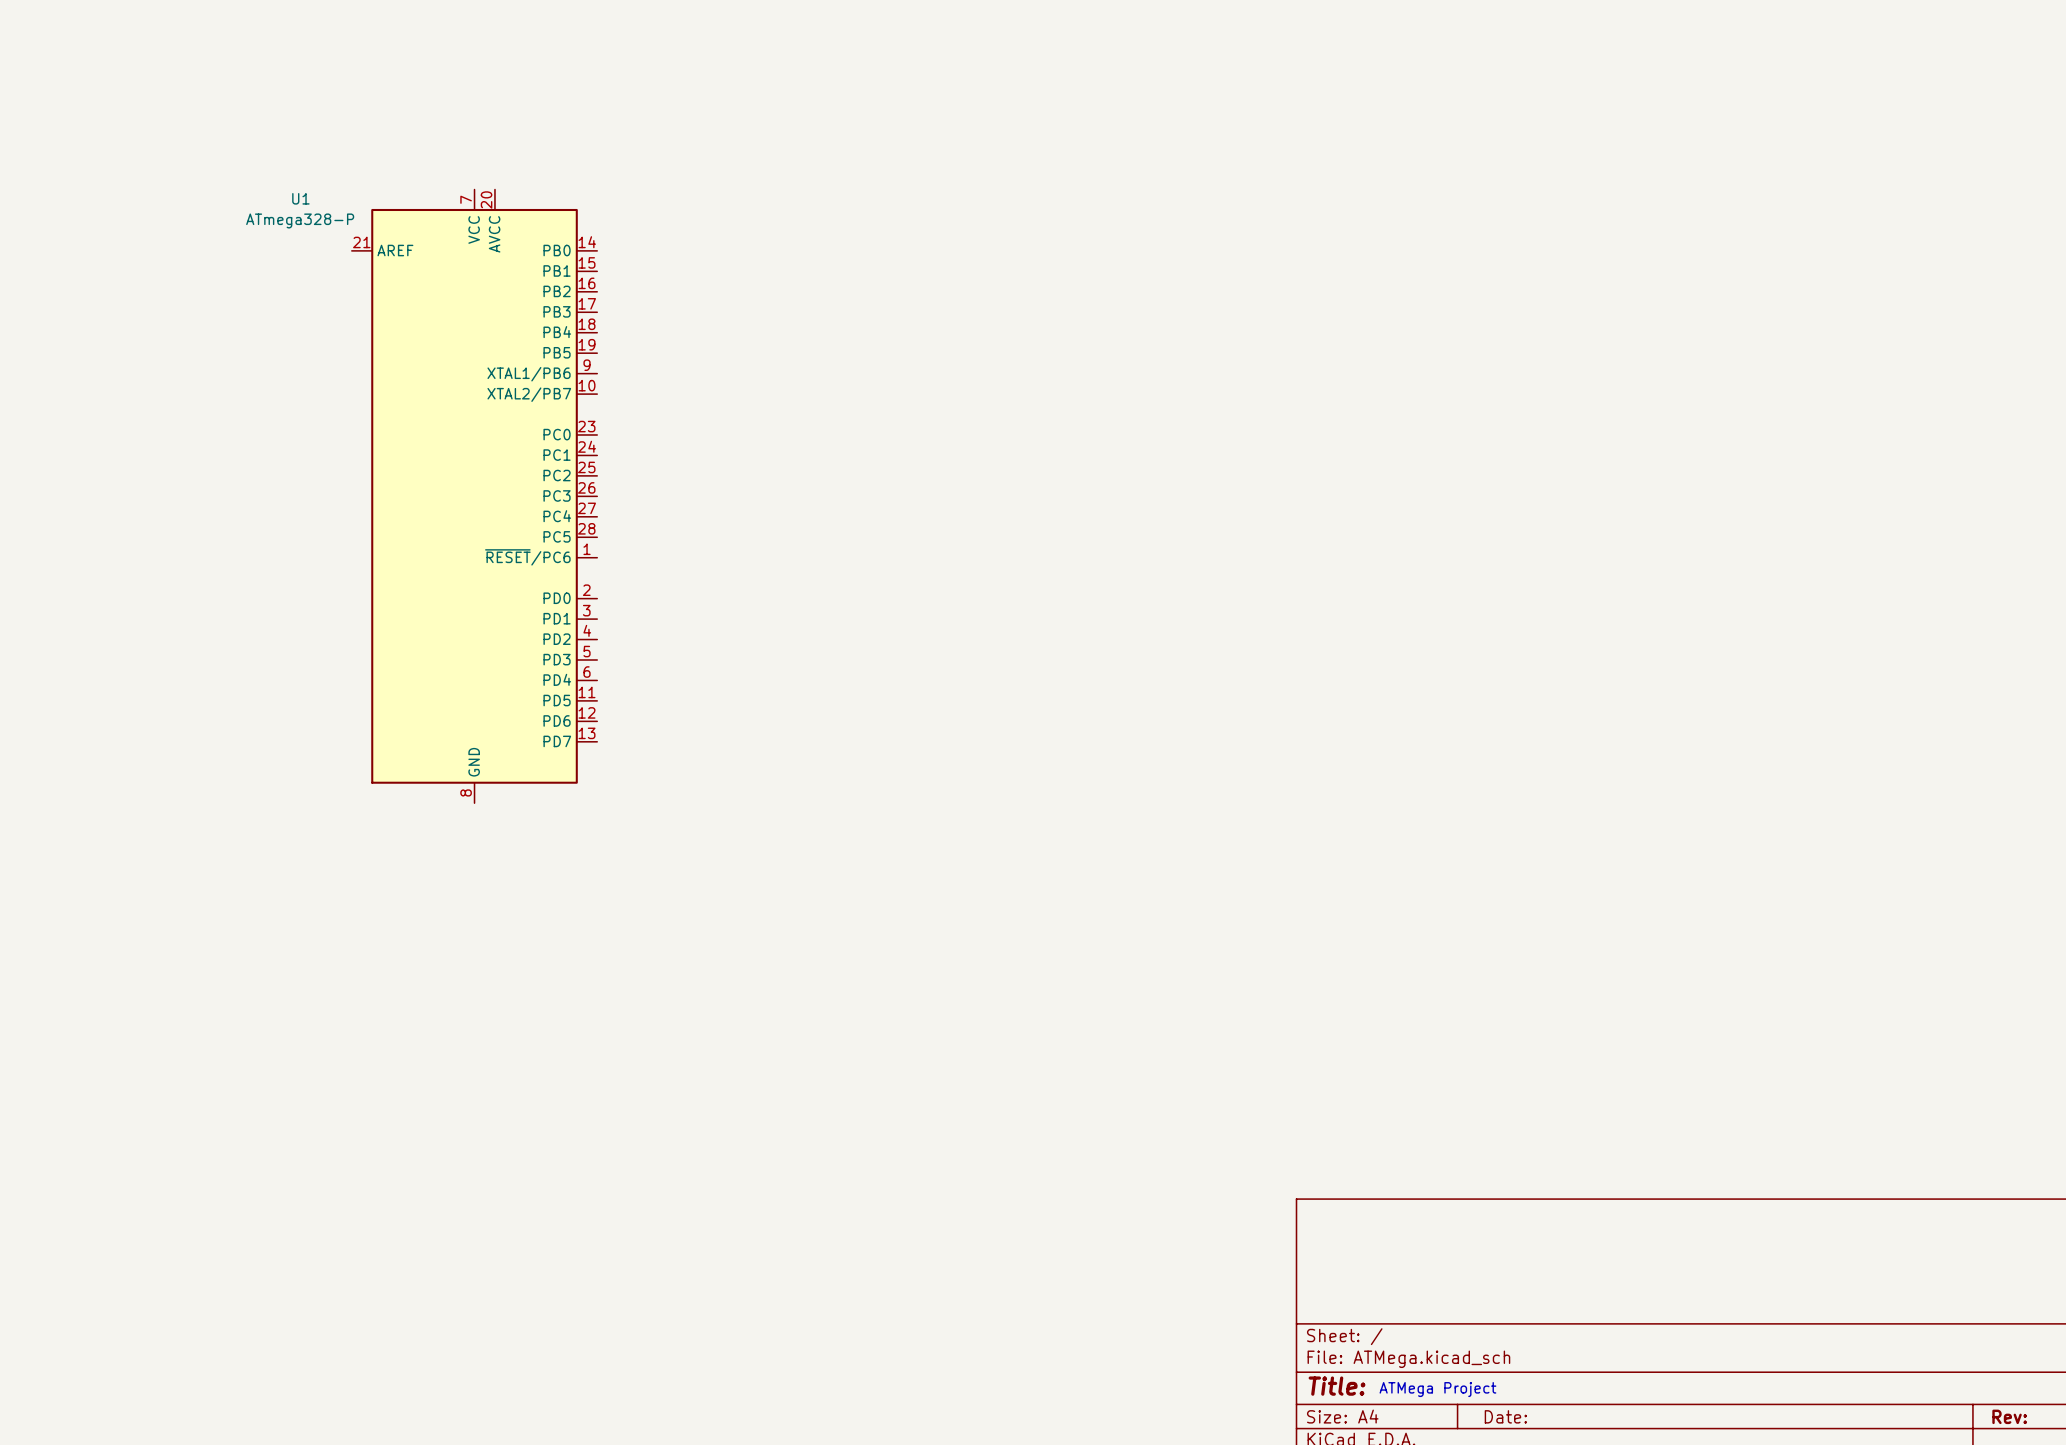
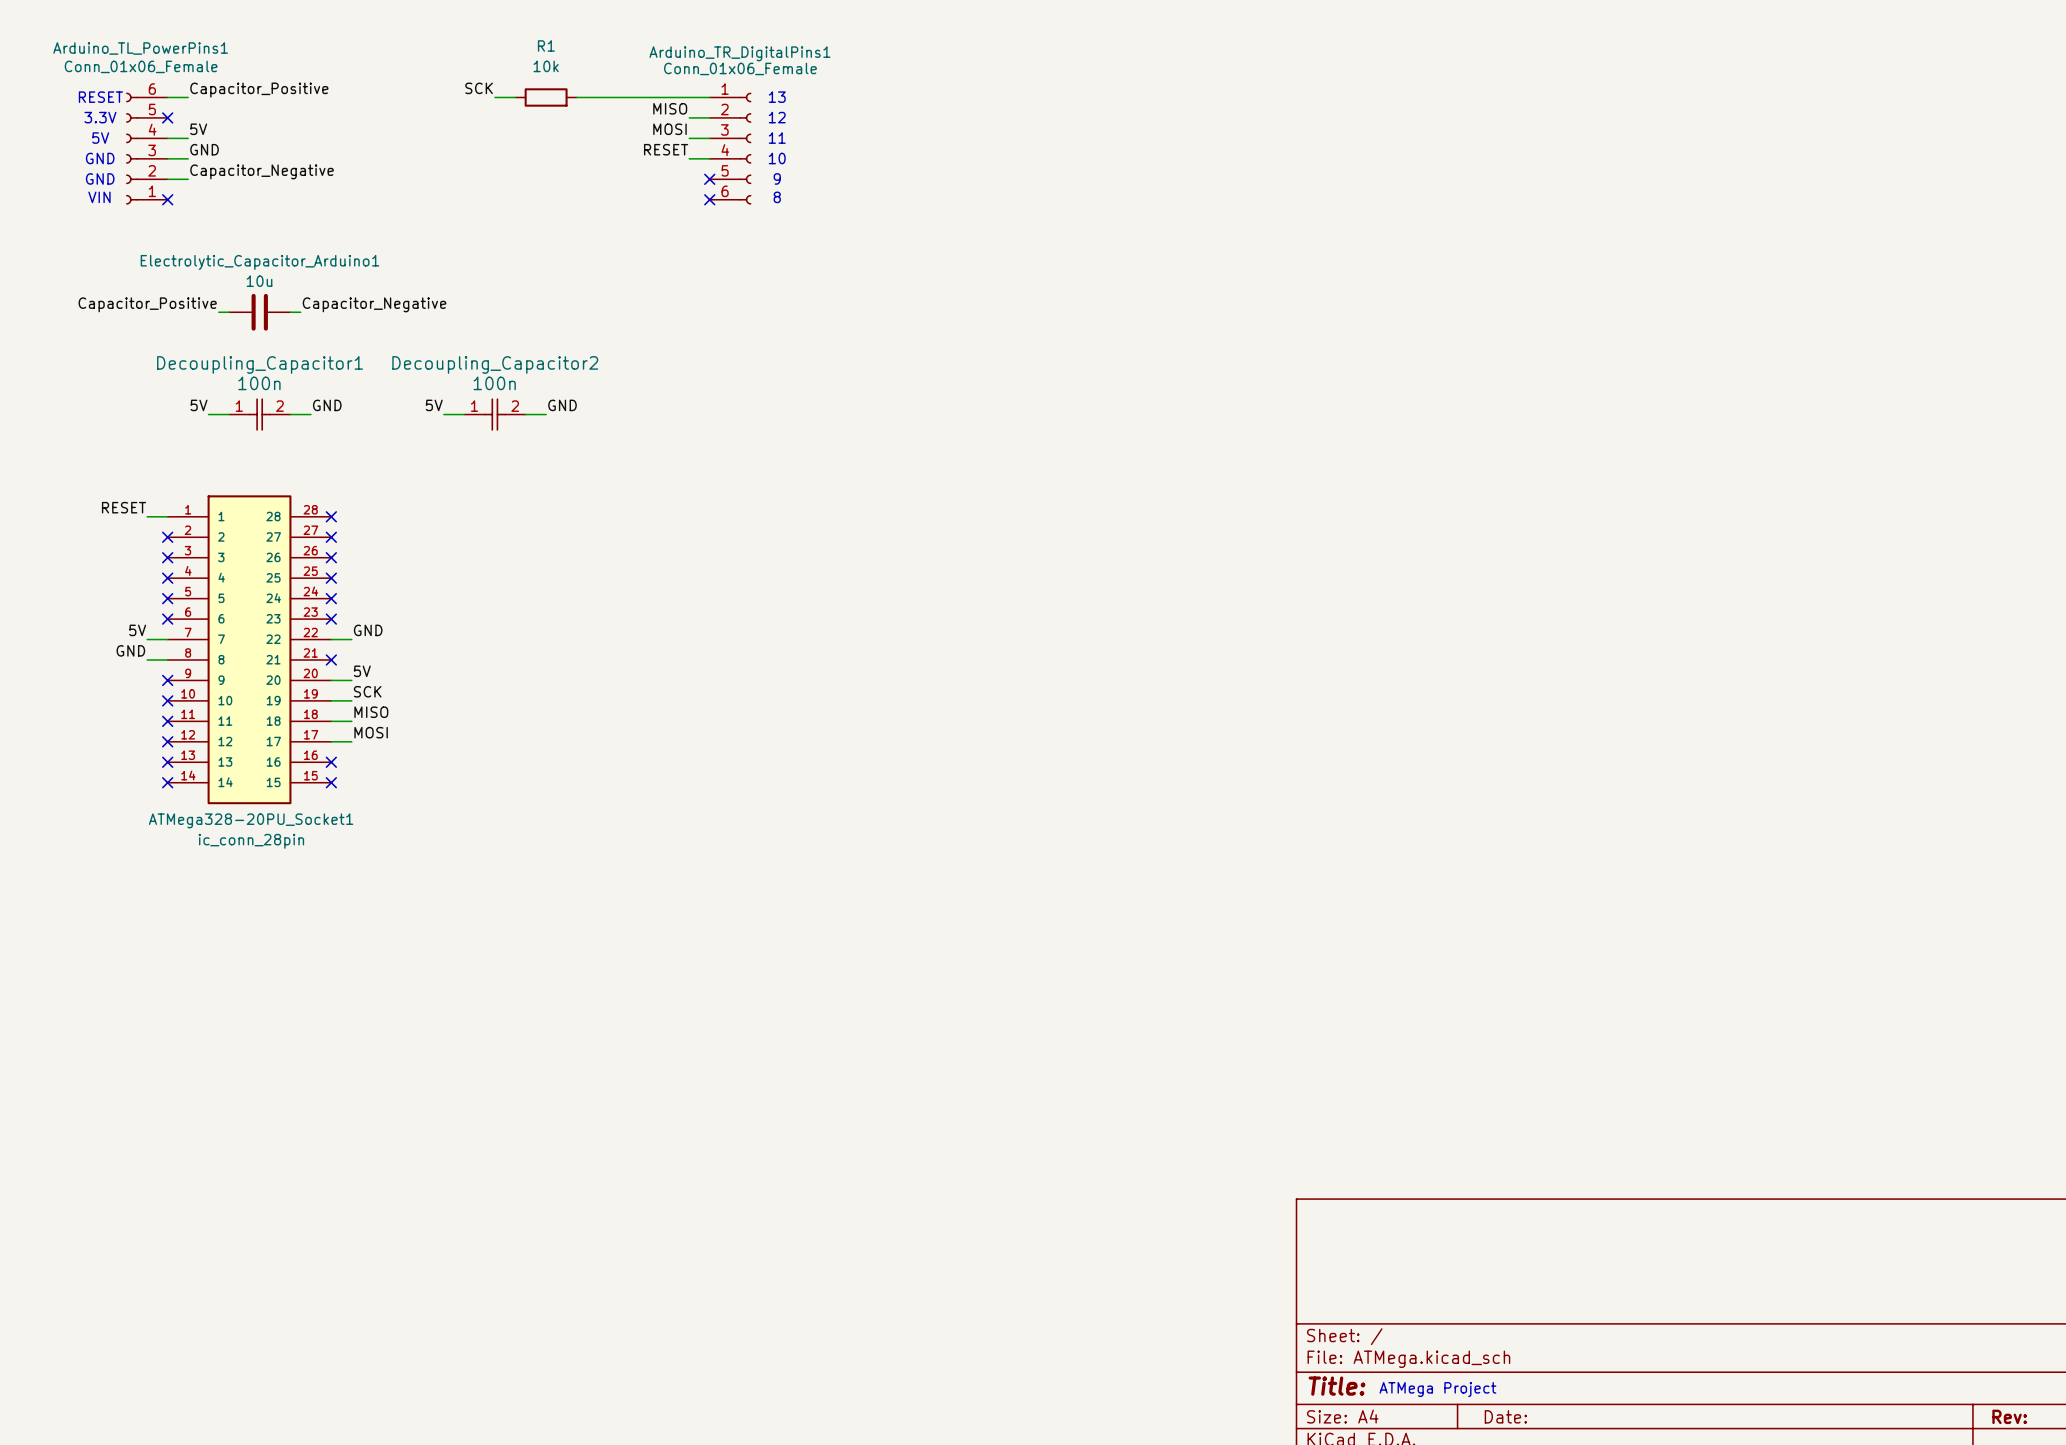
label: none -> SCK (479, 88)
label: none -> Capacitor_Positive (259, 90)
text: none -> RESET (100, 97)
wire: none -> (167, 97) (188, 97)
wire: none -> (494, 97) (515, 97)
R1: none -> 10k (546, 97)
wire: none -> (576, 97) (709, 97)
text: none -> 13 (777, 97)
label: none -> MISO (670, 108)
text: none -> 3.3V (100, 117)
no-connect mark: none -> (167, 117)
wire: none -> (689, 117) (709, 117)
text: none -> 12 (777, 117)
label: none -> 5V (198, 129)
label: none -> MOSI (669, 129)
text: none -> 5V (100, 138)
wire: none -> (167, 138) (188, 138)
wire: none -> (689, 138) (709, 138)
text: none -> 11 (777, 138)
Arduino_TL_PowerPins1: none -> Conn_01x06_Female (146, 148)
Arduino_TR_DigitalPins1: none -> Conn_01x06_Female (730, 148)
label: none -> GND (204, 149)
label: none -> RESET (666, 149)
text: none -> GND (100, 158)
wire: none -> (167, 158) (188, 158)
wire: none -> (689, 158) (709, 158)
text: none -> 10 (777, 158)
label: none -> Capacitor_Negative (262, 171)
text: none -> GND (100, 178)
text: none -> 9 (777, 178)
wire: none -> (167, 179) (188, 179)
no-connect mark: none -> (709, 179)
text: none -> VIN (99, 197)
text: none -> 8 (777, 197)
no-connect mark: none -> (167, 199)
no-connect mark: none -> (709, 199)
label: none -> Capacitor_Positive (147, 304)
label: none -> Capacitor_Negative (374, 304)
wire: none -> (218, 312) (229, 312)
Electrolytic_Capacitor_Arduino1: none -> 10u (259, 312)
wire: none -> (290, 312) (300, 312)
label: none -> 5V (199, 405)
label: none -> GND (327, 405)
label: none -> 5V (434, 405)
label: none -> GND (562, 405)
wire: none -> (208, 414) (229, 414)
Decoupling_Capacitor1: none -> 100n (259, 414)
wire: none -> (290, 414) (310, 414)
Decoupling_Capacitor2: none -> 100n (494, 414)
U1: ATmega328-P (474, 496) -> none
label: none -> RESET (124, 507)
wire: none -> (147, 516) (167, 516)
no-connect mark: none -> (331, 516)
no-connect mark: none -> (167, 537)
no-connect mark: none -> (331, 537)
no-connect mark: none -> (167, 557)
no-connect mark: none -> (331, 557)
no-connect mark: none -> (167, 578)
no-connect mark: none -> (331, 578)
no-connect mark: none -> (167, 598)
no-connect mark: none -> (331, 598)
no-connect mark: none -> (167, 619)
no-connect mark: none -> (331, 619)
label: none -> 5V (137, 630)
label: none -> GND (368, 630)
wire: none -> (147, 639) (167, 639)
wire: none -> (331, 639) (351, 639)
ATMega328-20PU_Socket1: none -> ic_conn_28pin (249, 649)
label: none -> GND (130, 650)
wire: none -> (147, 659) (167, 659)
no-connect mark: none -> (331, 659)
label: none -> 5V (362, 671)
no-connect mark: none -> (167, 680)
wire: none -> (331, 680) (351, 680)
label: none -> SCK (367, 691)
no-connect mark: none -> (167, 700)
wire: none -> (331, 700) (351, 700)
label: none -> MISO (371, 712)
no-connect mark: none -> (167, 721)
wire: none -> (331, 721) (351, 721)
label: none -> MOSI (371, 732)
no-connect mark: none -> (167, 741)
wire: none -> (331, 741) (351, 741)
no-connect mark: none -> (167, 762)
no-connect mark: none -> (331, 762)
no-connect mark: none -> (167, 782)
no-connect mark: none -> (331, 782)

